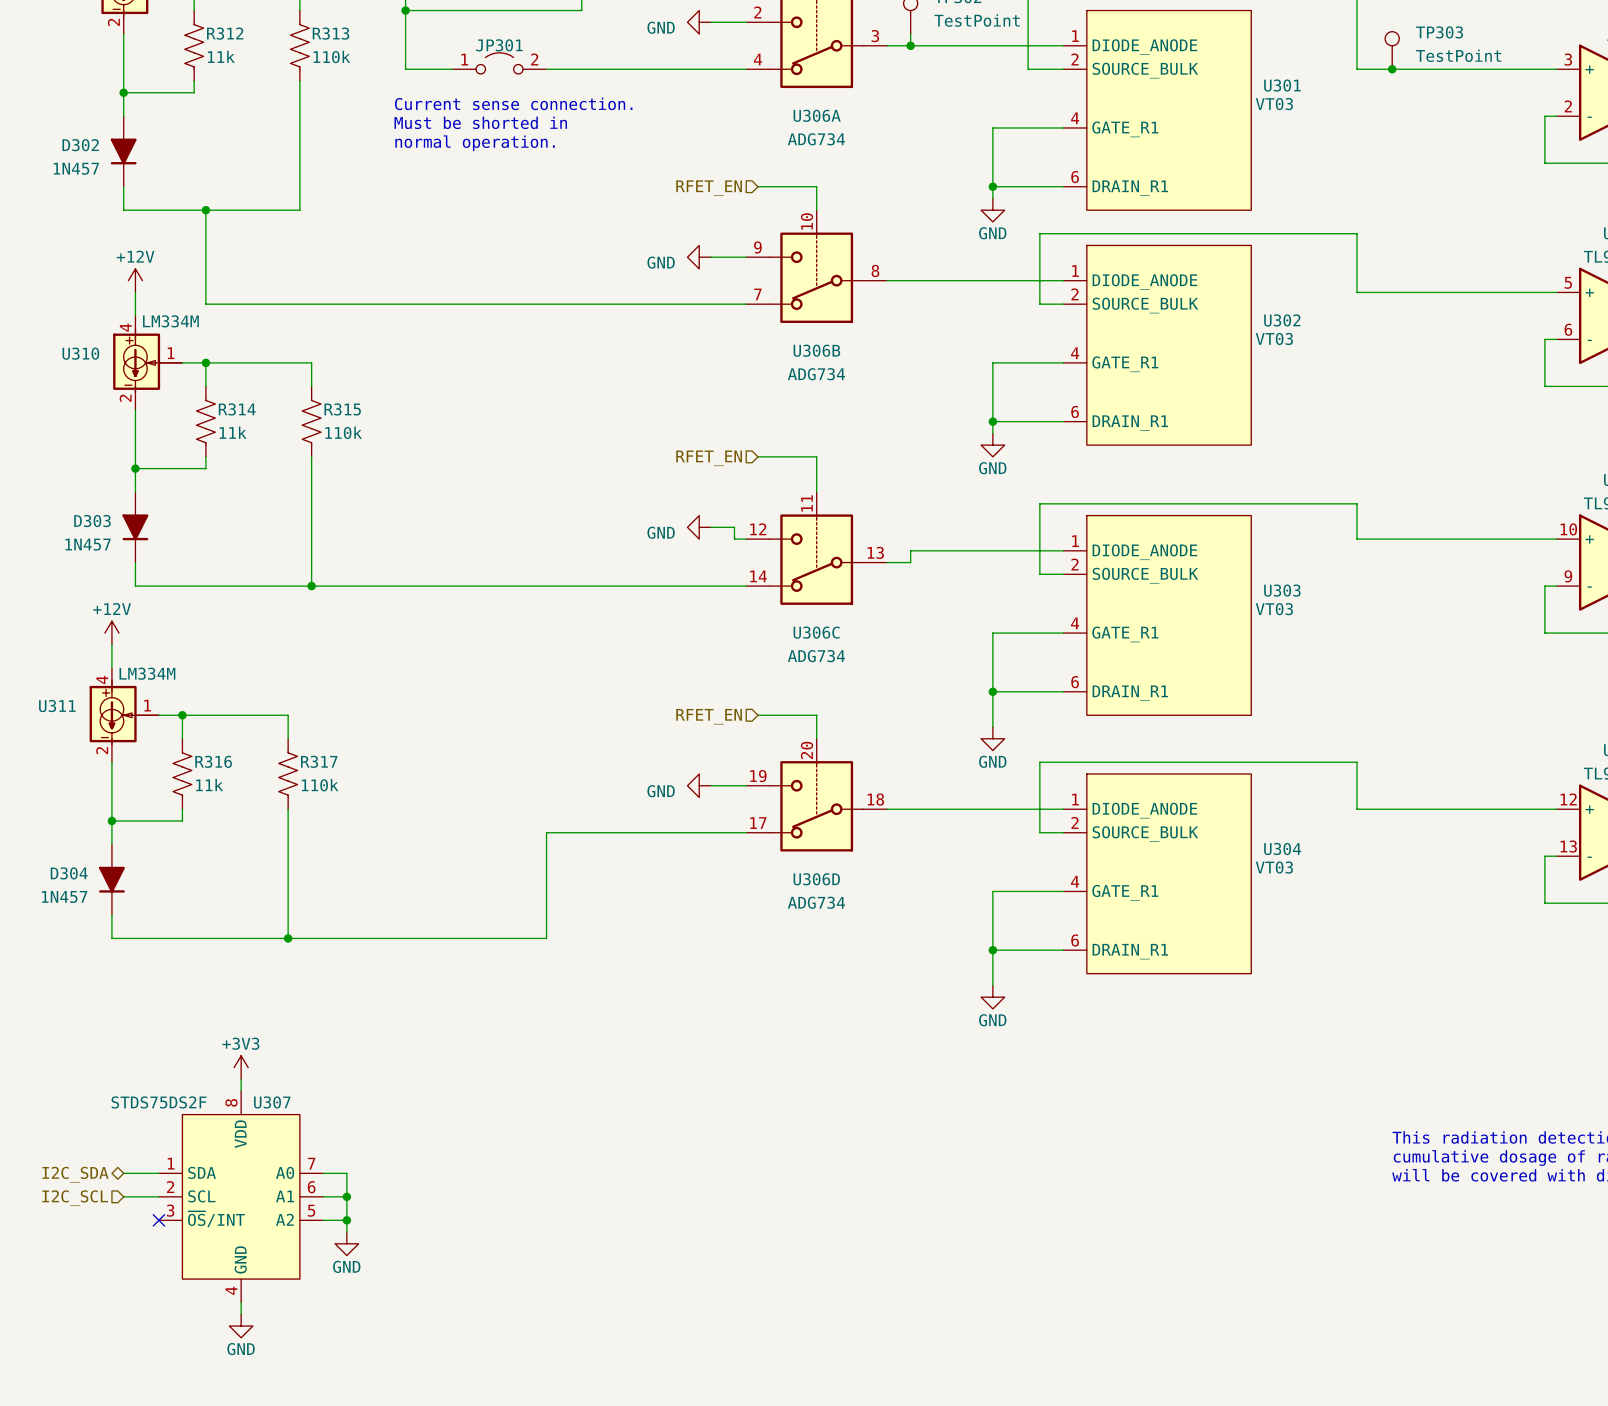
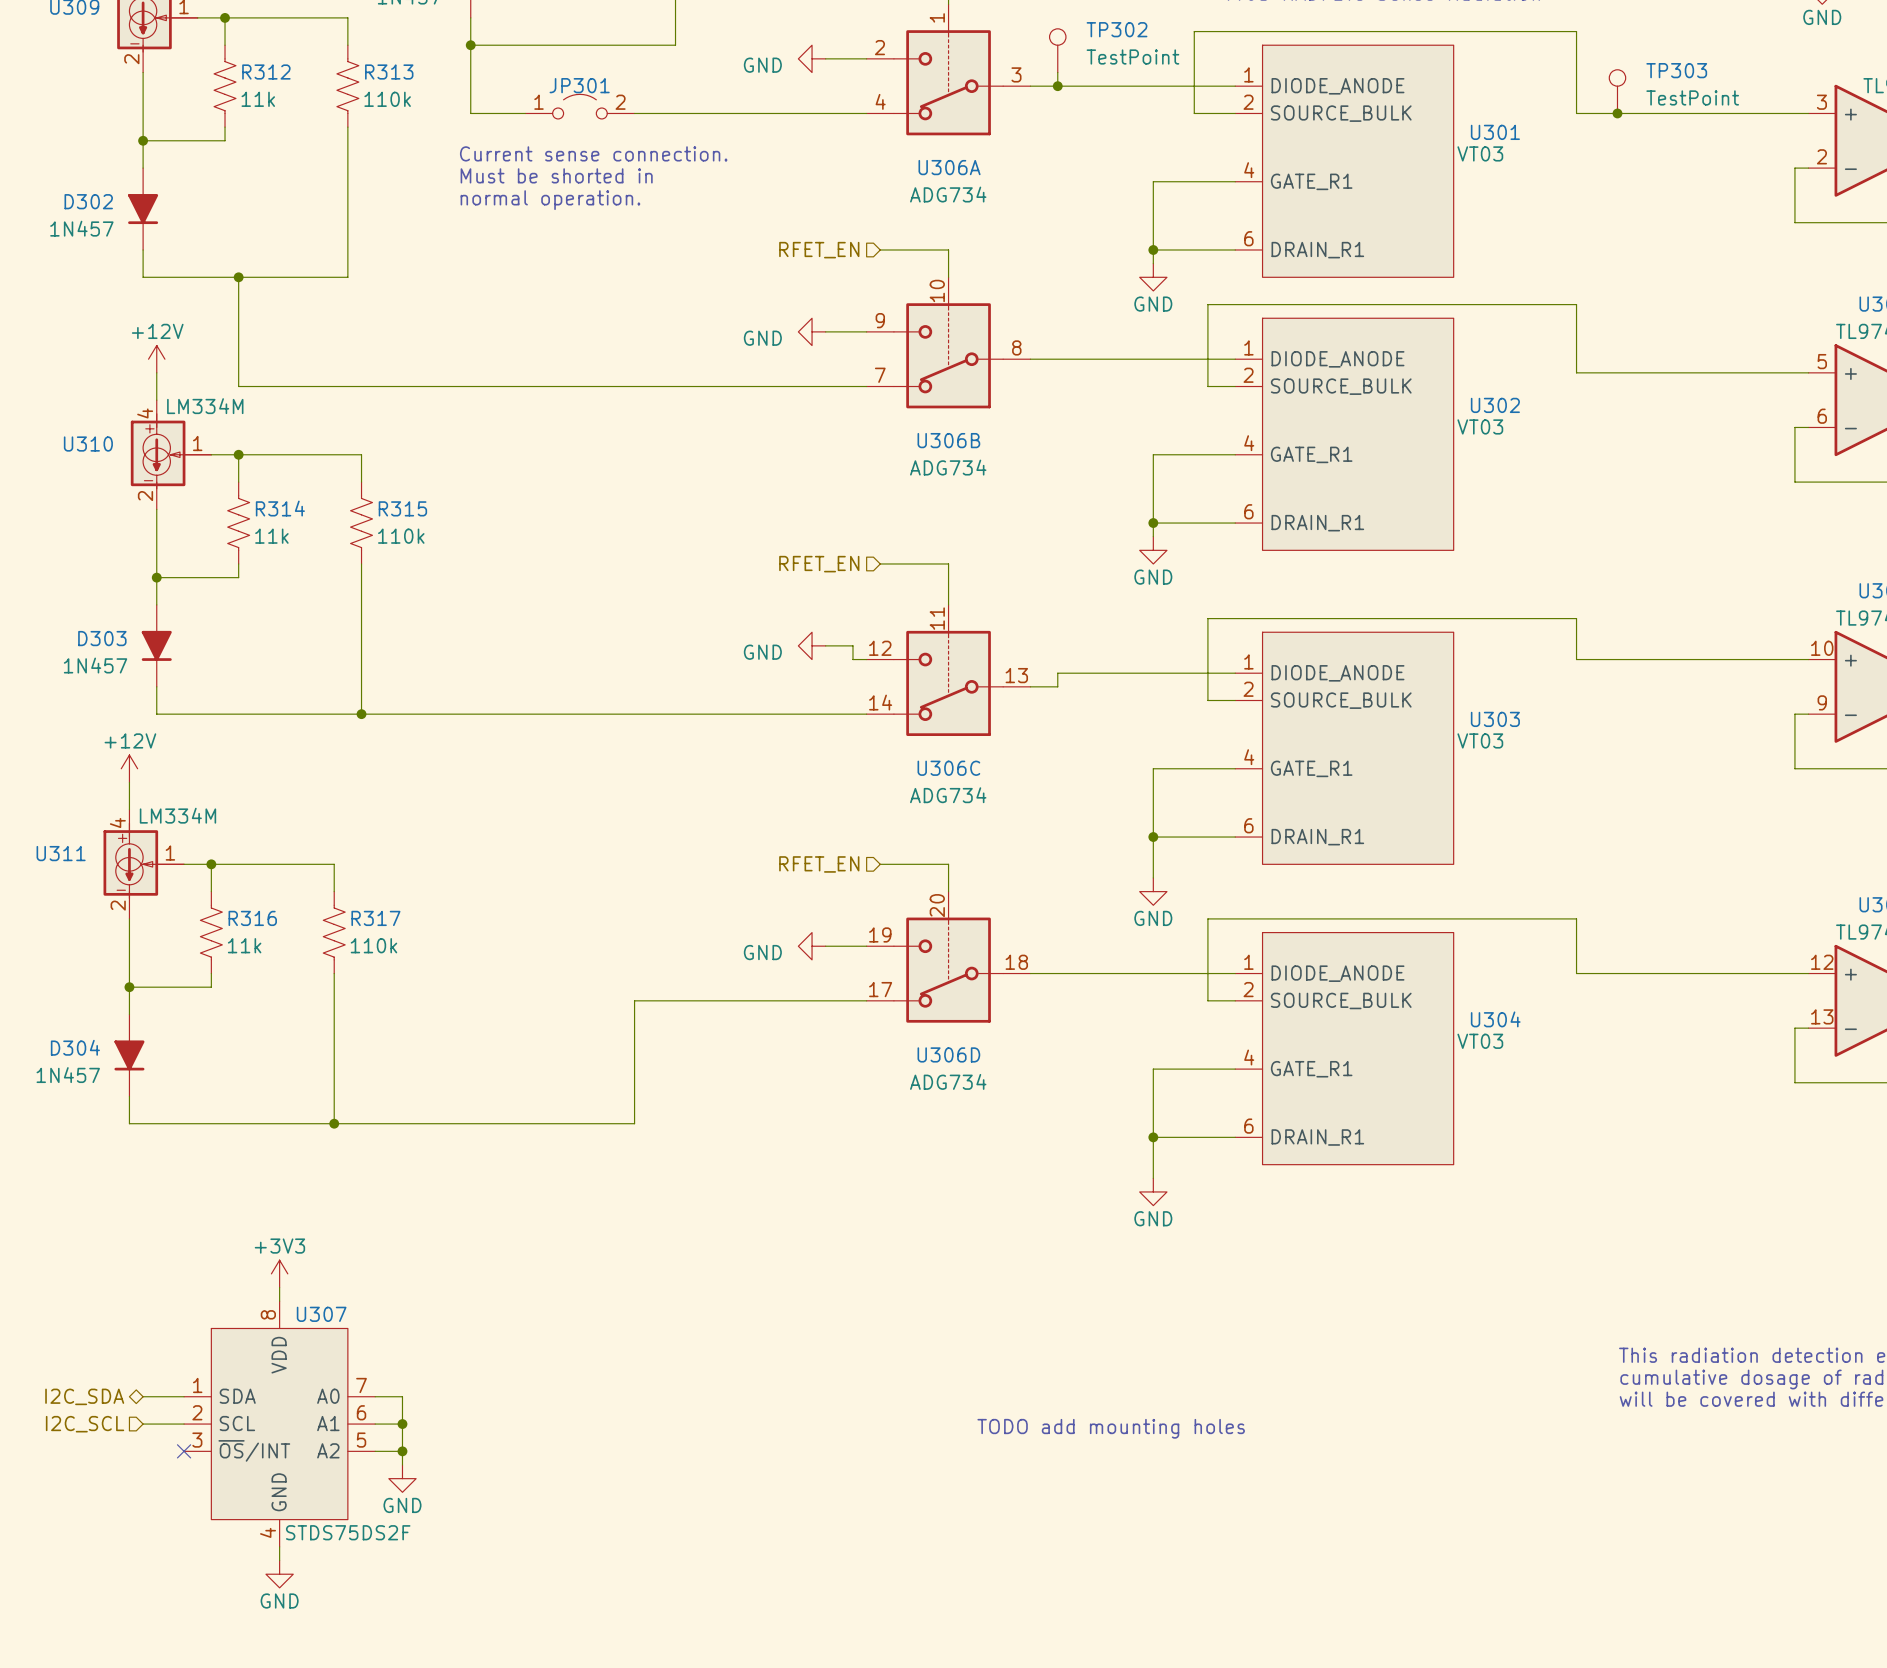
U307 value position: STDS75DS2F (159, 1102) -> STDS75DS2F (348, 1532)
text: none -> TODO add mounting holes (1111, 1428)

